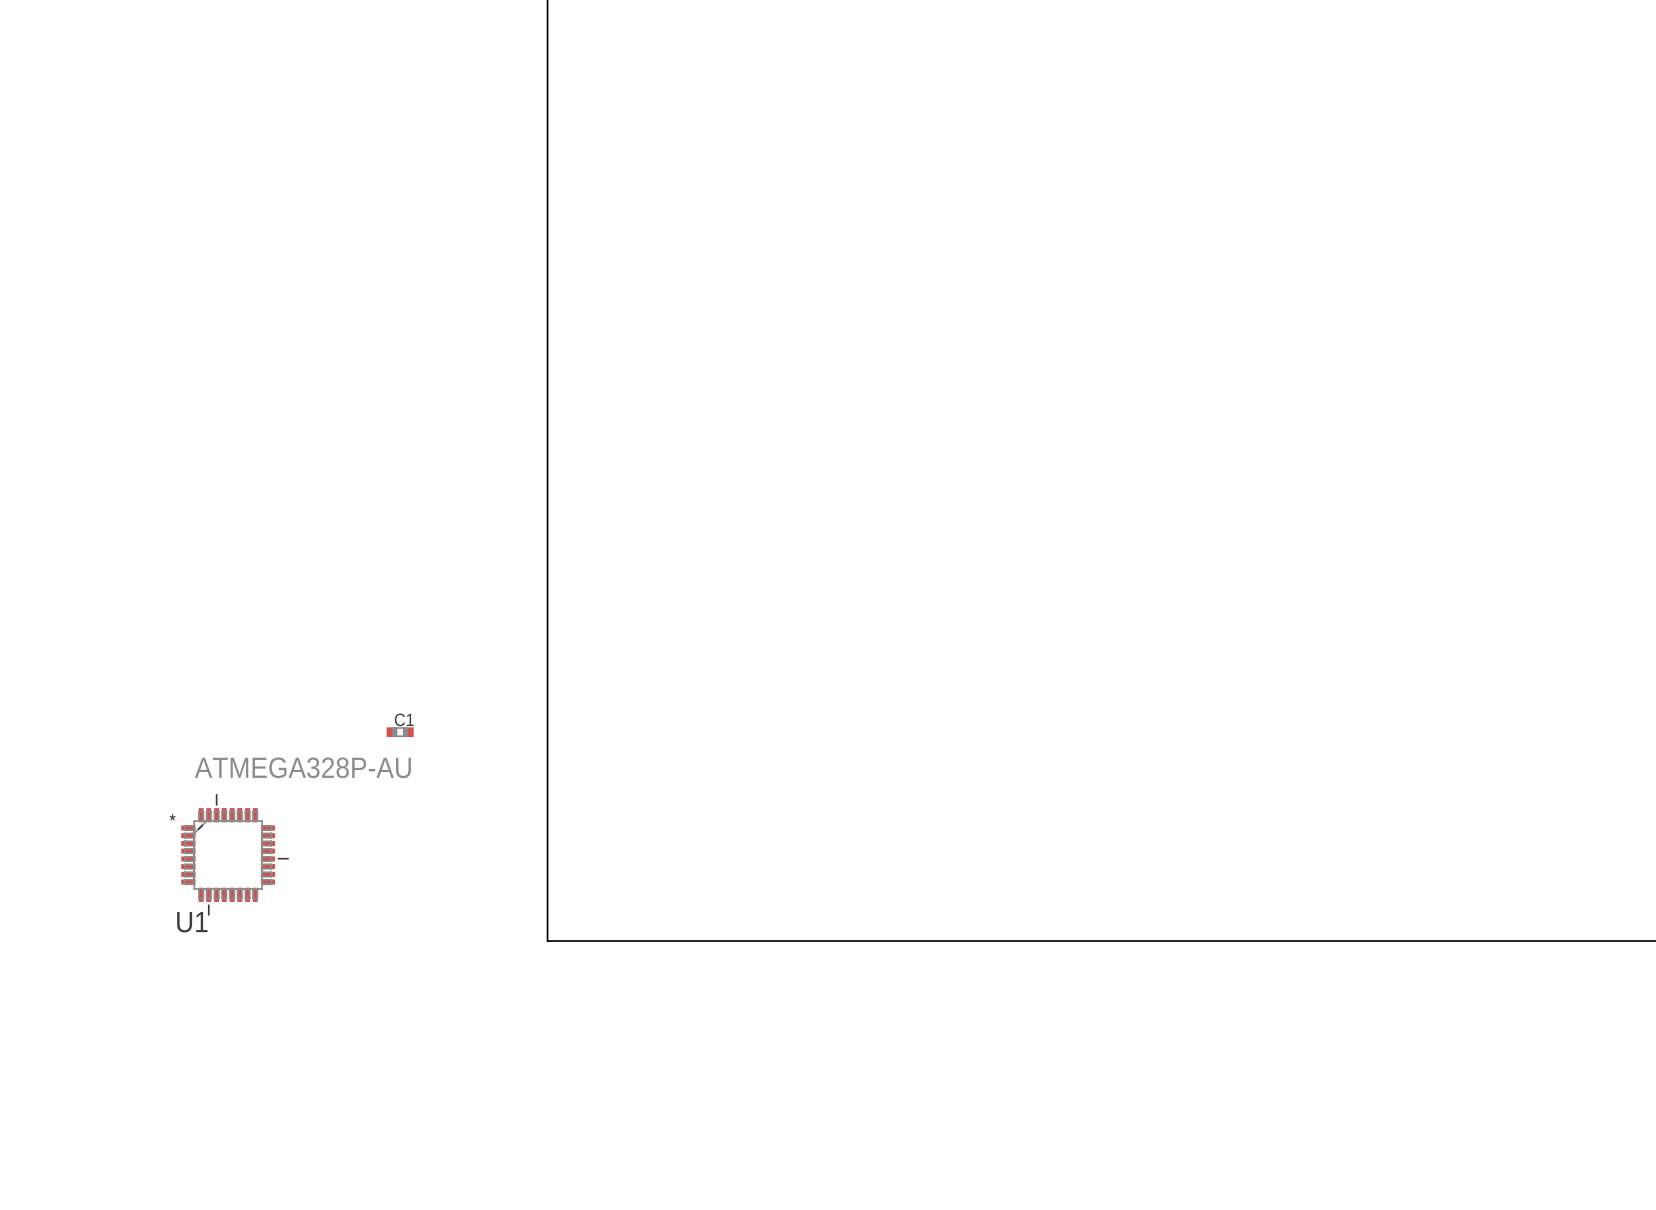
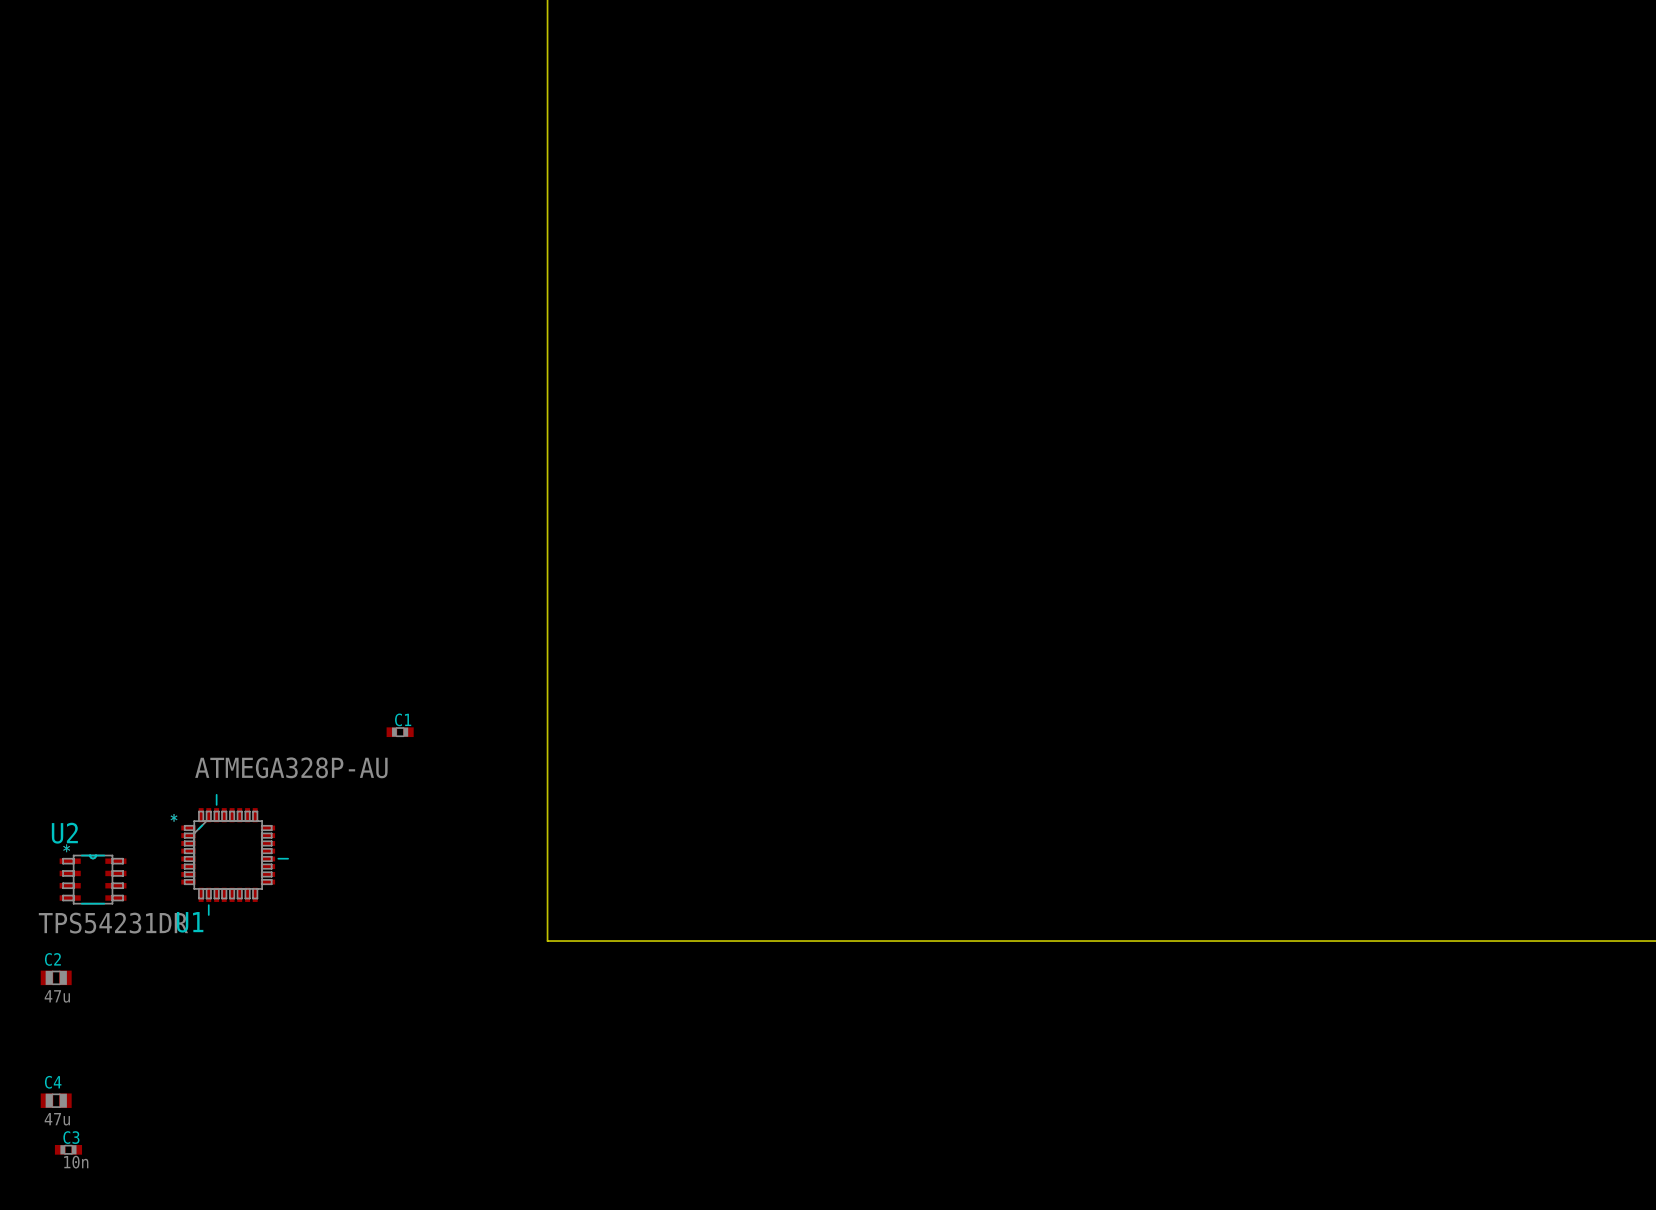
U2: none -> TPS54231DR (93, 879)
C2: none -> 47u (56, 977)
C4: none -> 47u (56, 1100)
C3: none -> 10n (68, 1149)

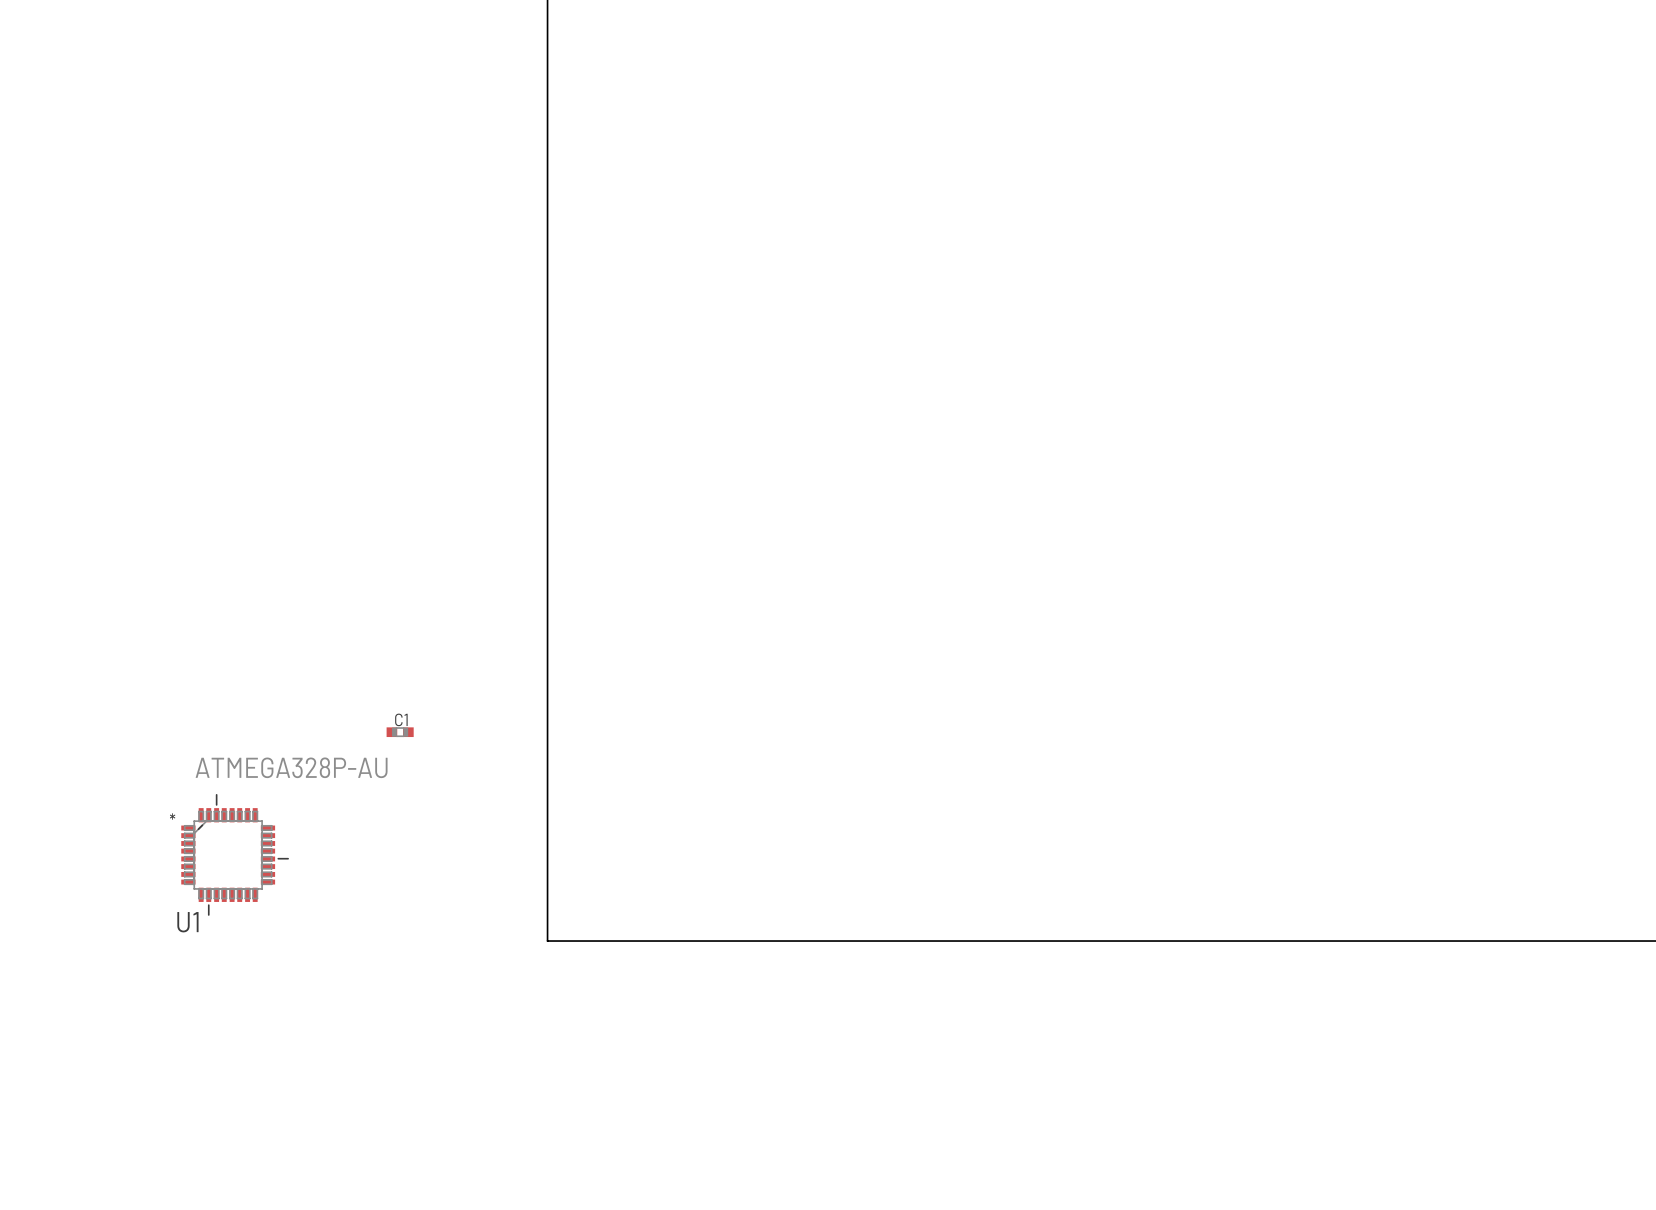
U2: TPS54231DR (93, 879) -> none
C2: 47u (56, 977) -> none
C4: 47u (56, 1100) -> none
C3: 10n (68, 1149) -> none

